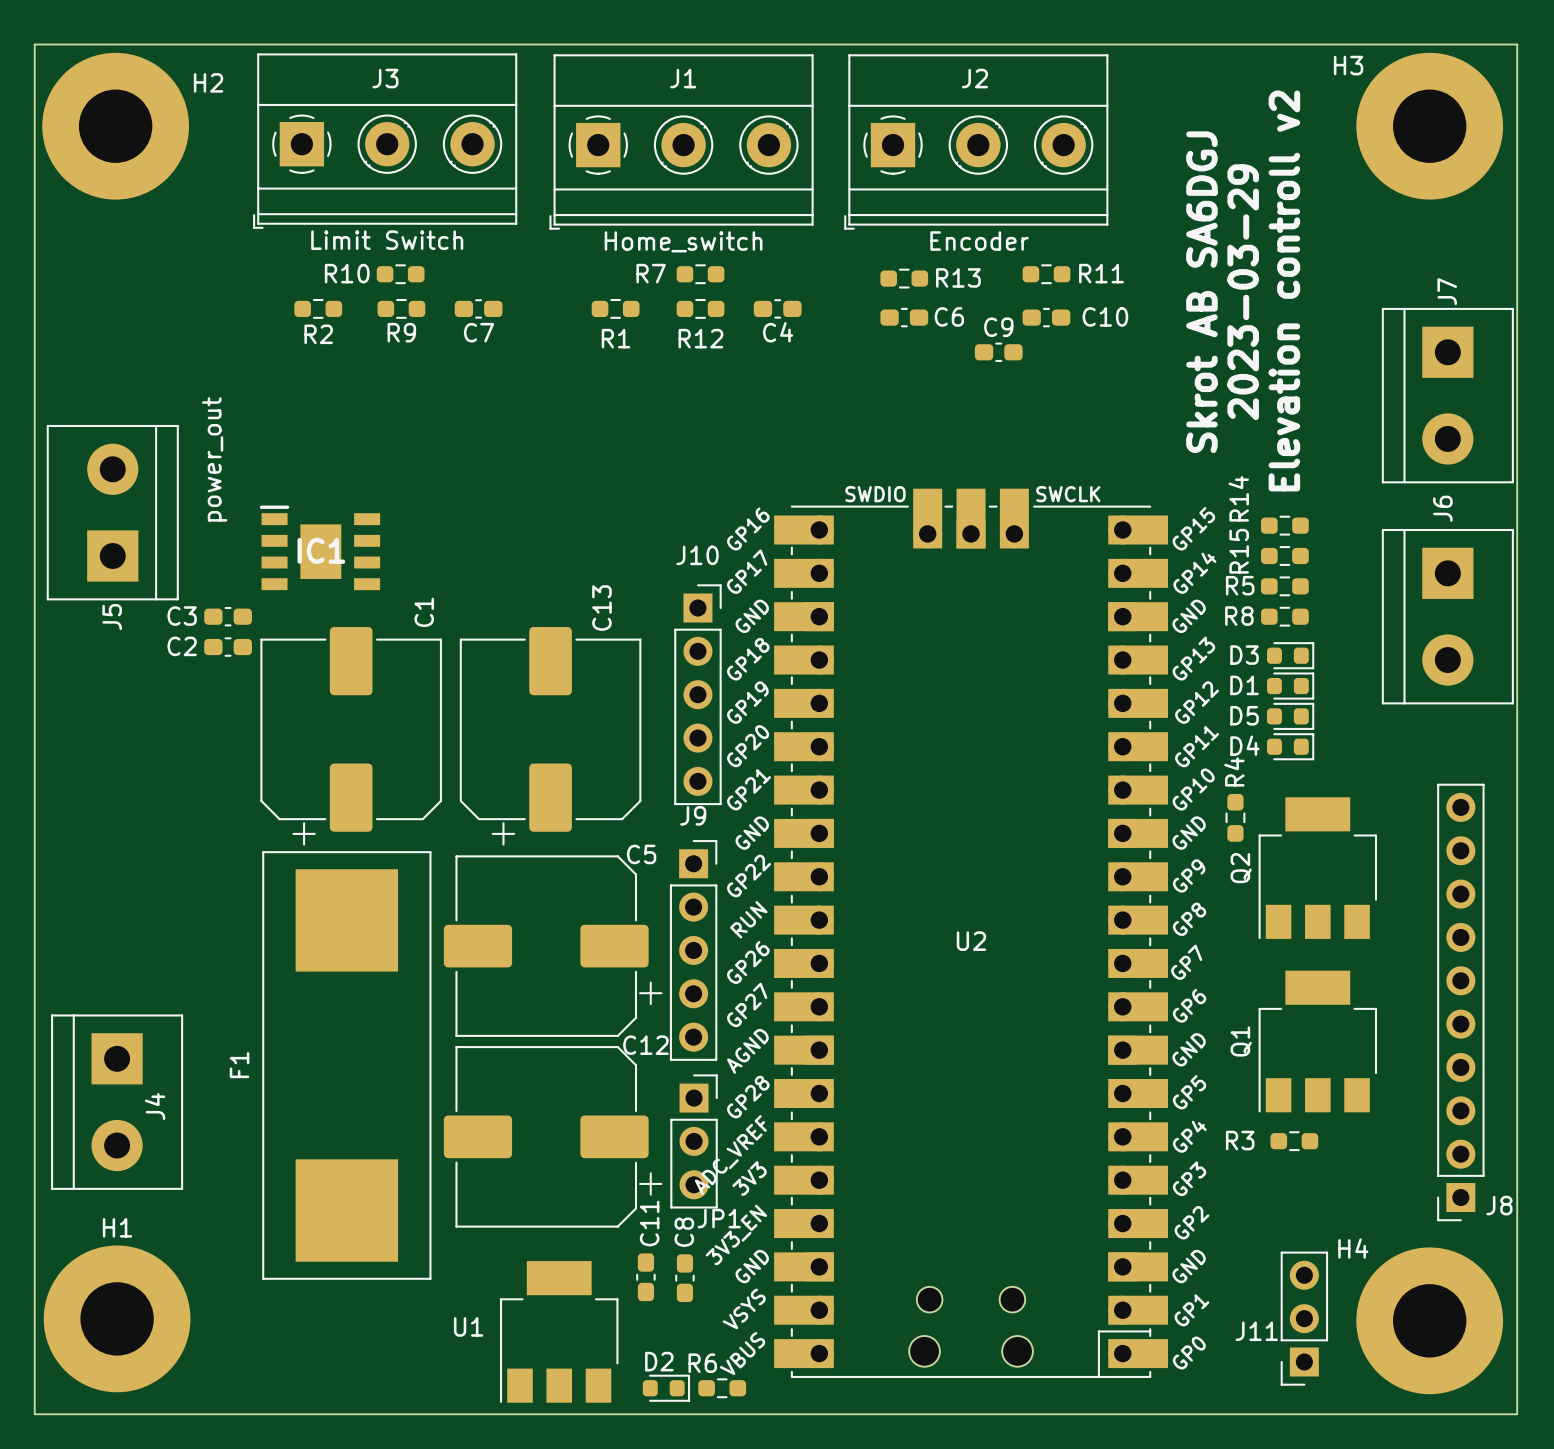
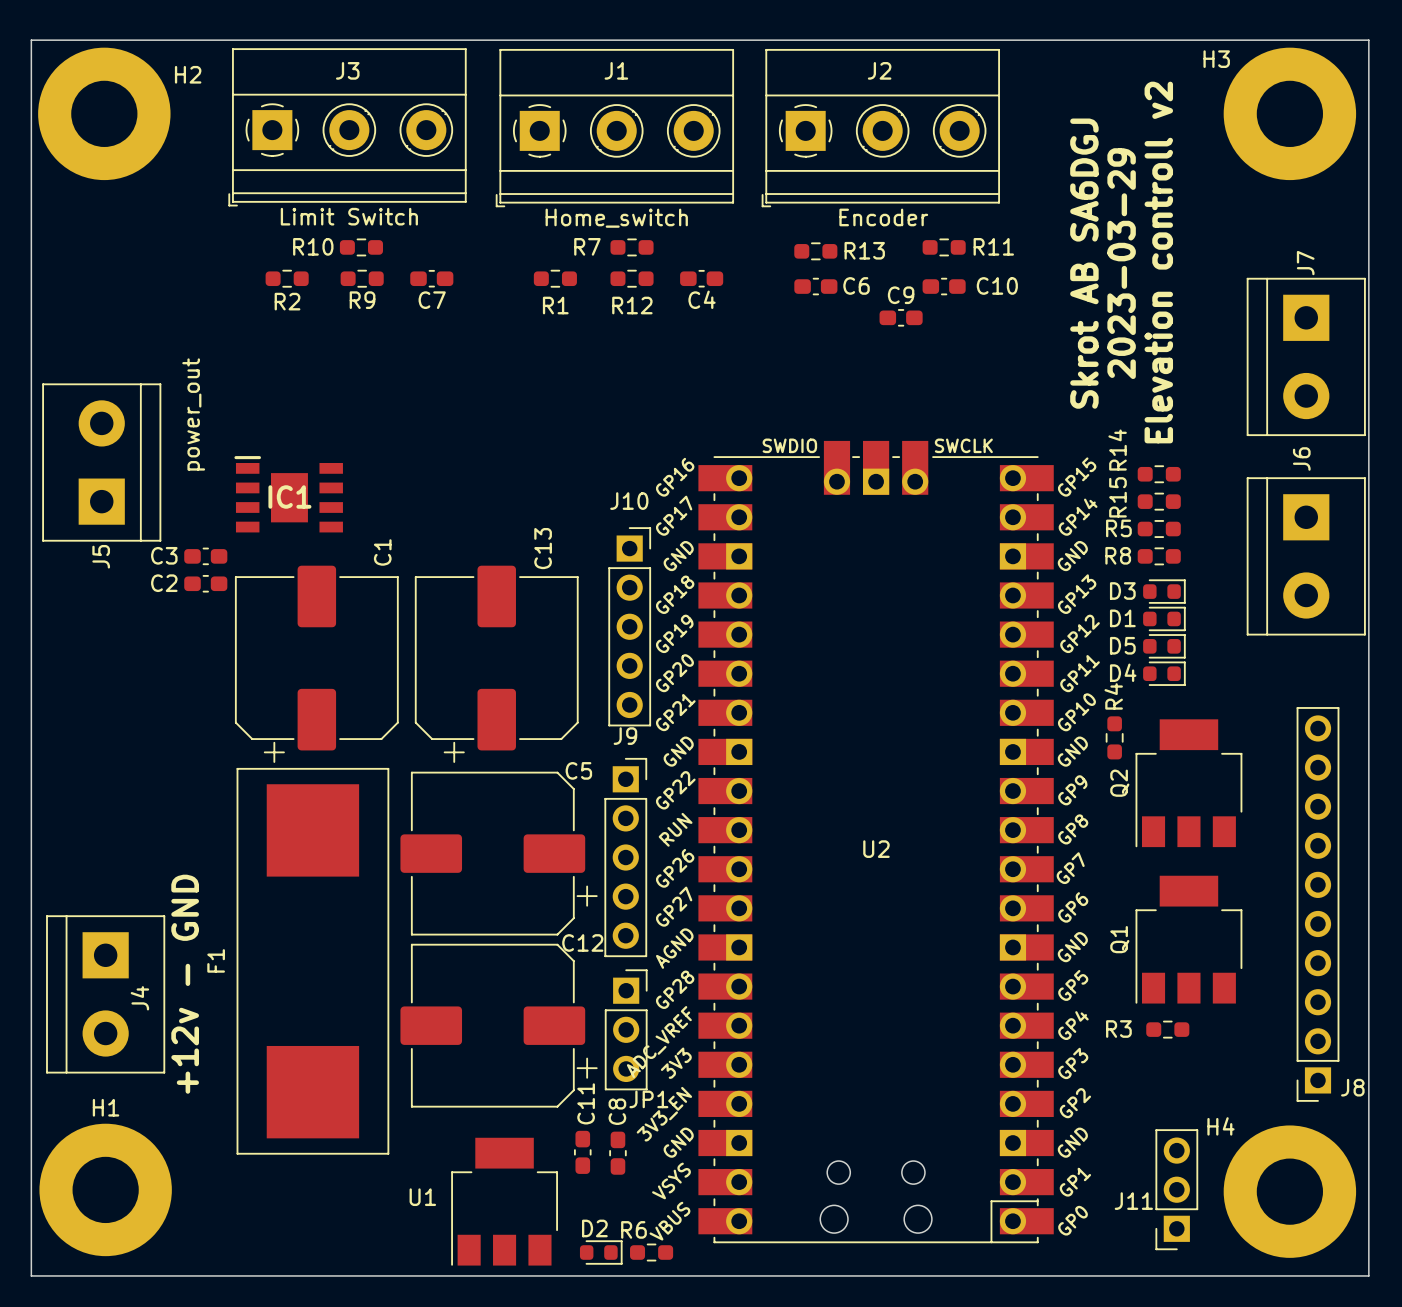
text: none -> +12v - GND (185, 984)

